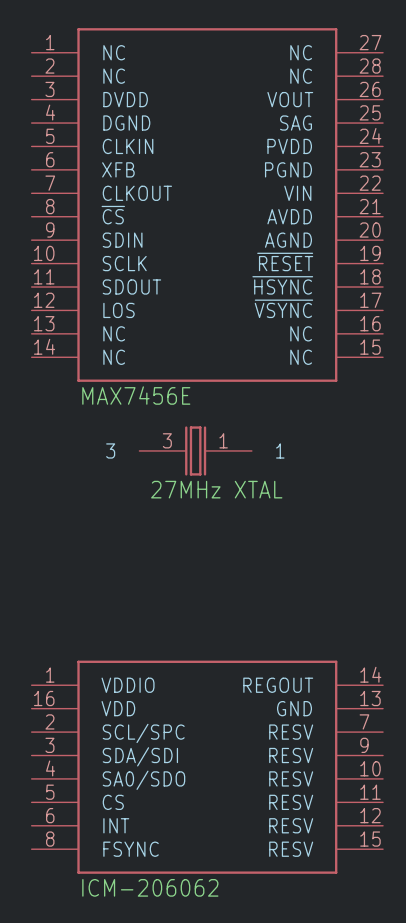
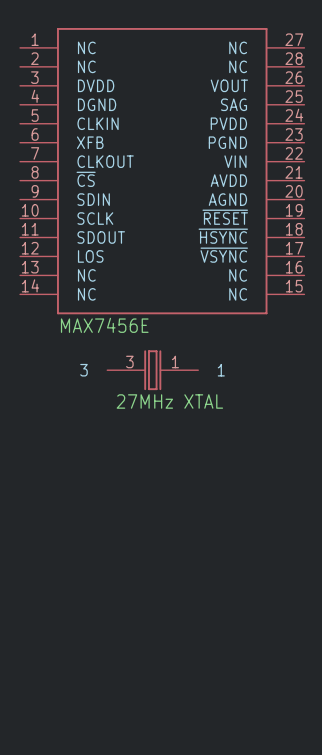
part: (207, 767) -> none
text: ICM-206062 (150, 887) -> none

